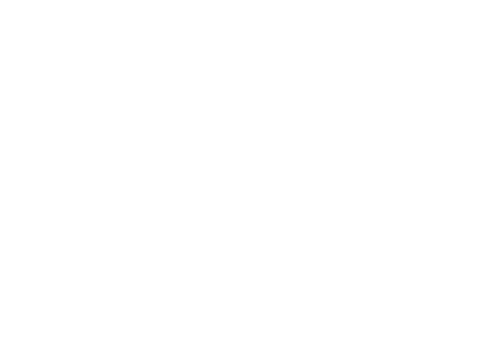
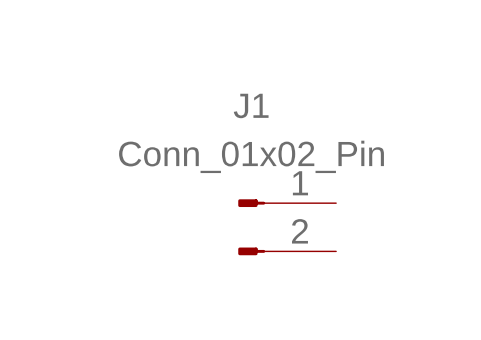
J1: none -> Conn_01x02_Pin (287, 227)

